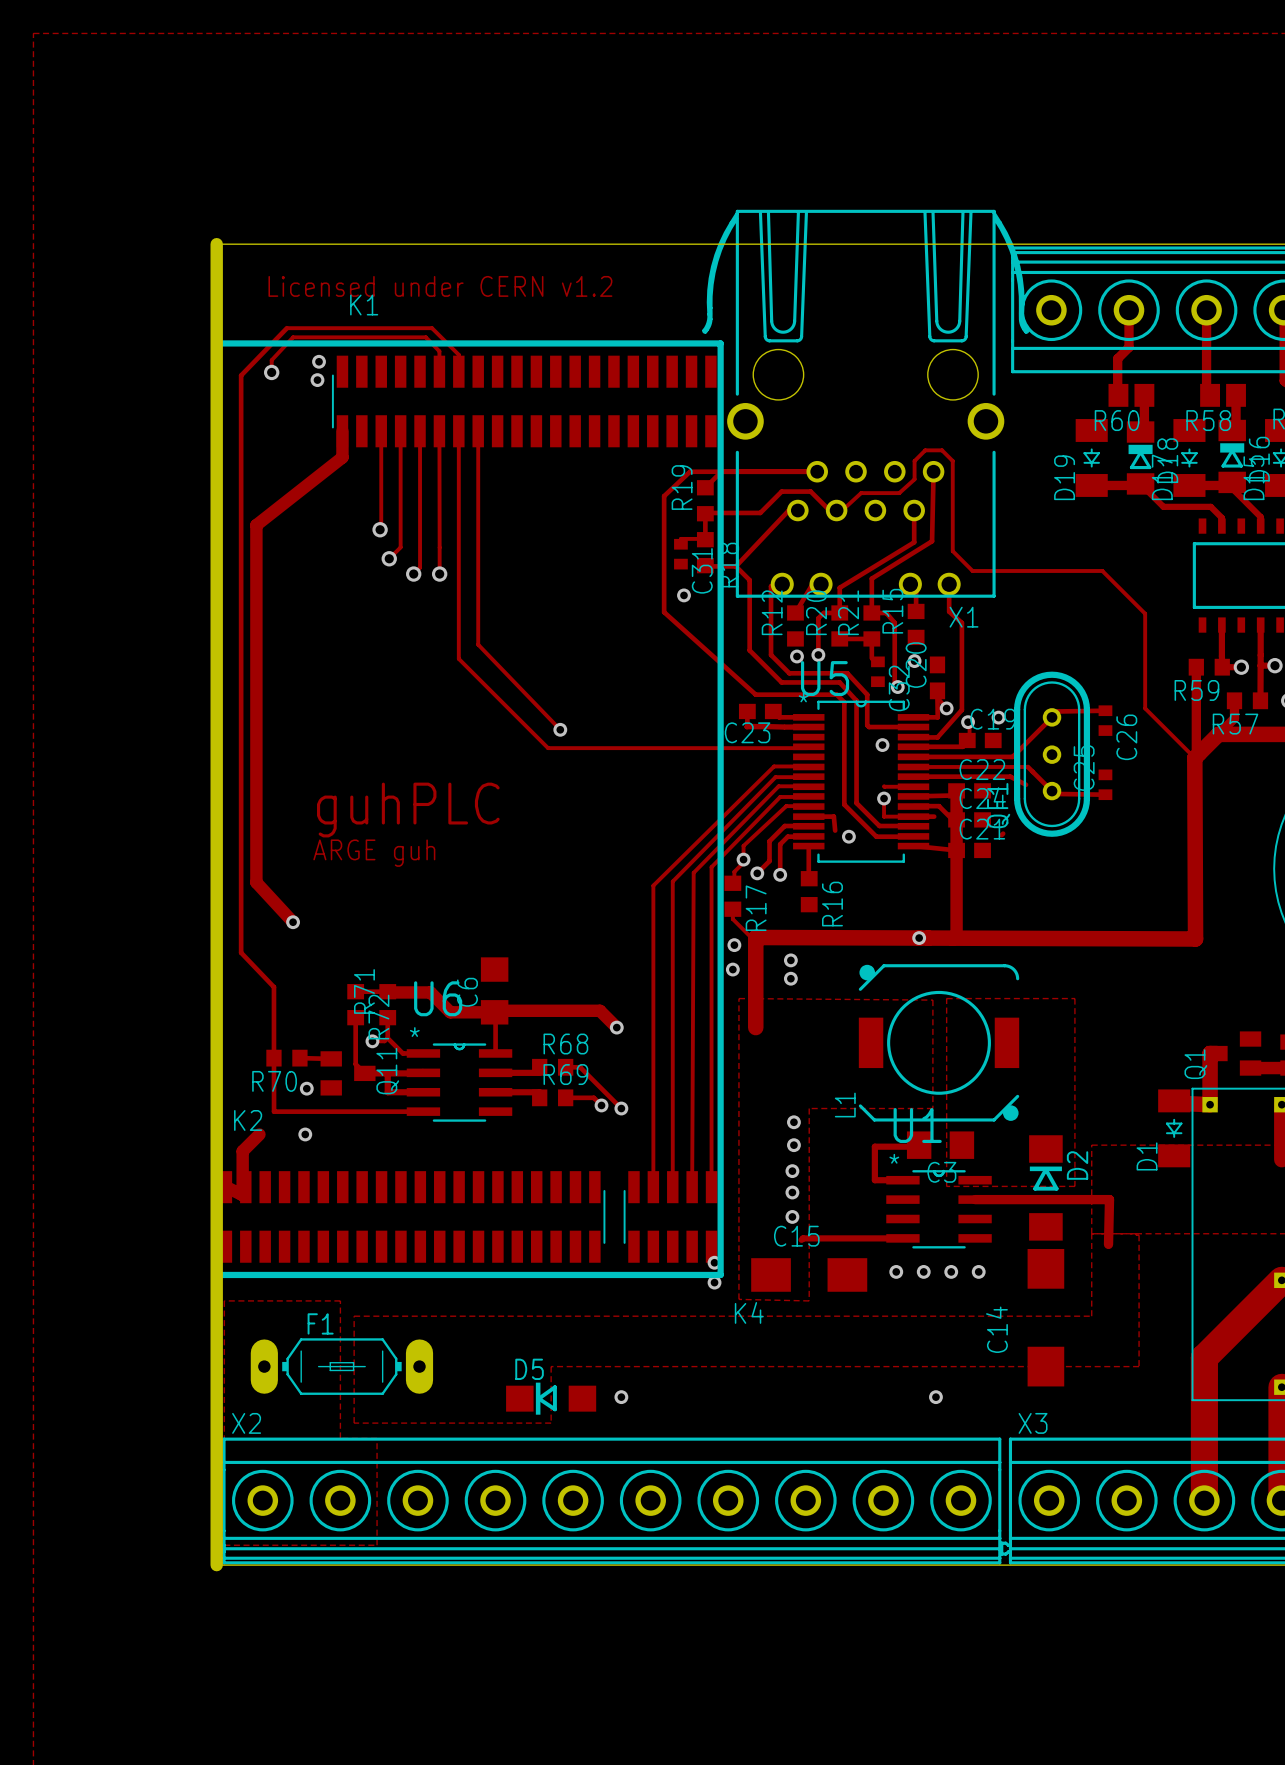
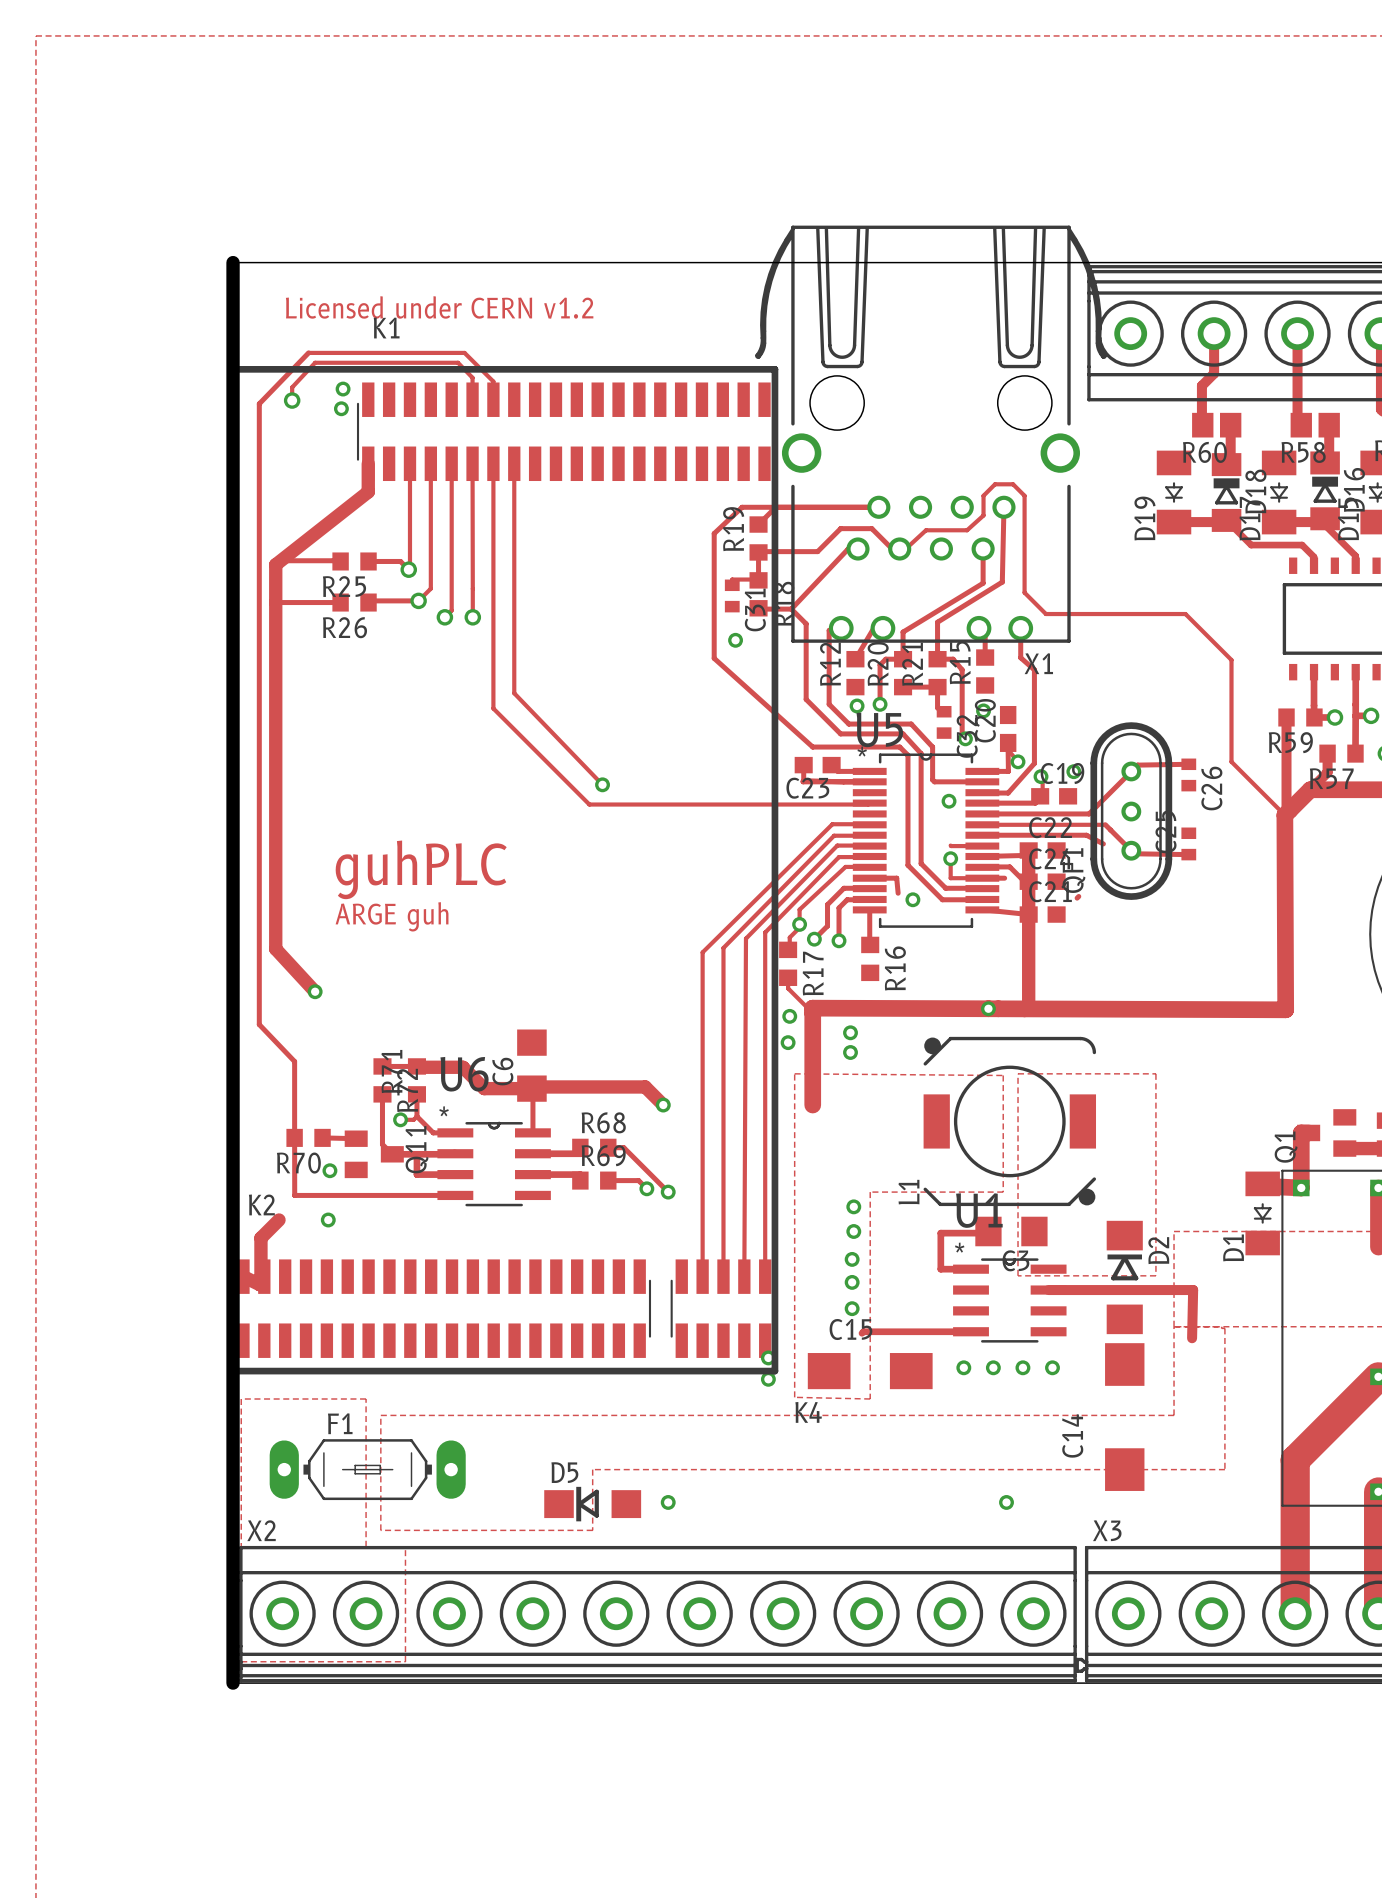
track: none -> (281, 560) (340, 561)
R25: none -> (354, 561)
track: none -> (368, 561) (400, 561) (408, 569)
track: none -> (418, 600) (370, 600) (368, 602)
track: none -> (275, 602) (340, 602)
R26: none -> (354, 602)

